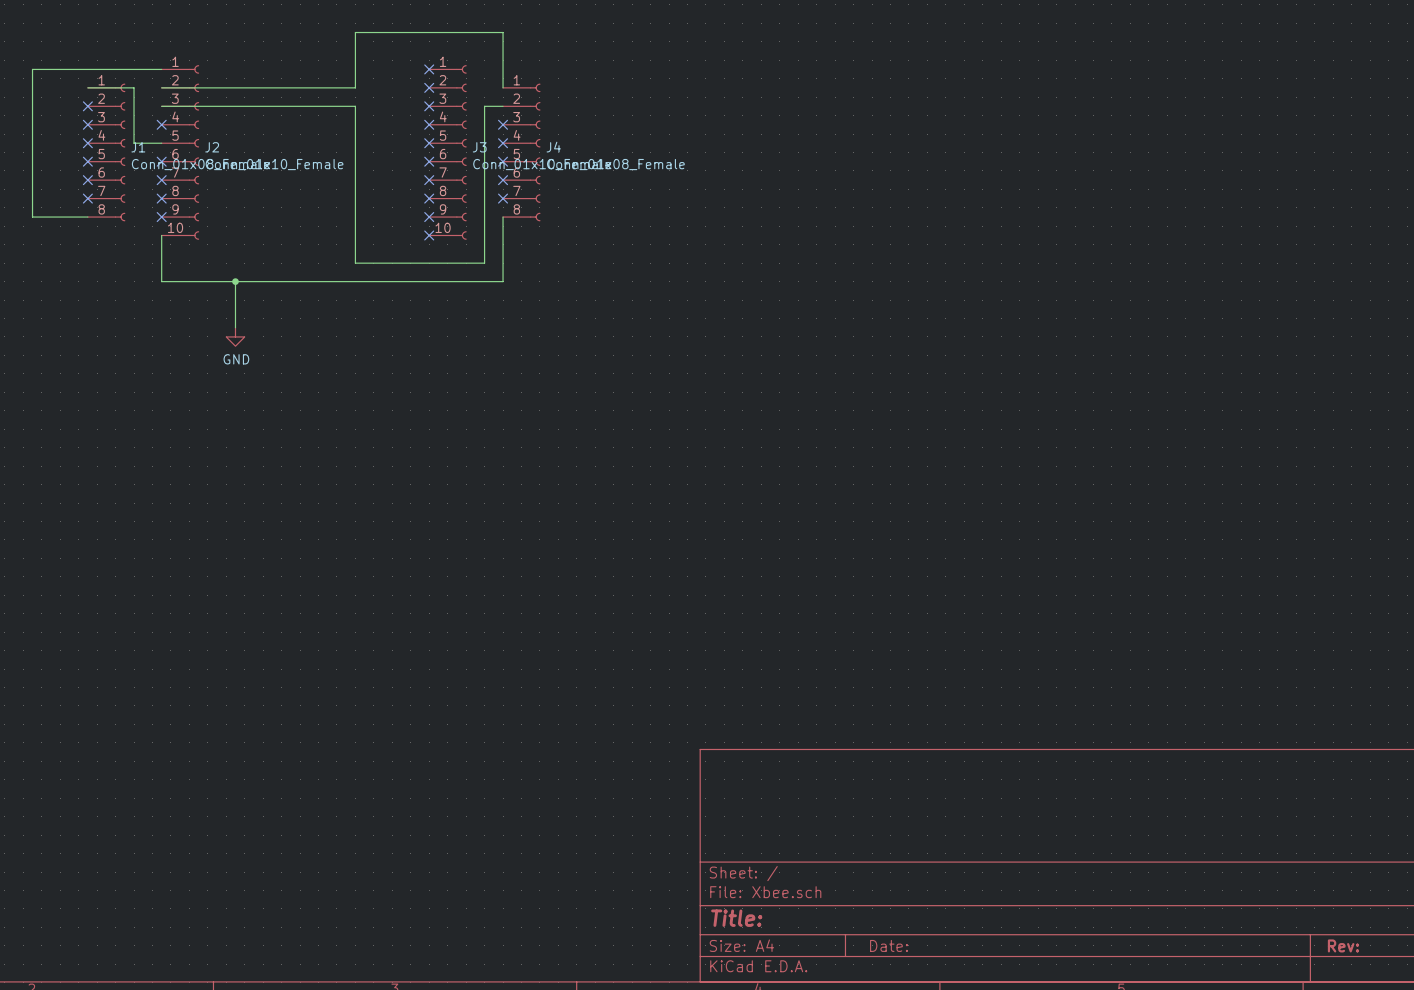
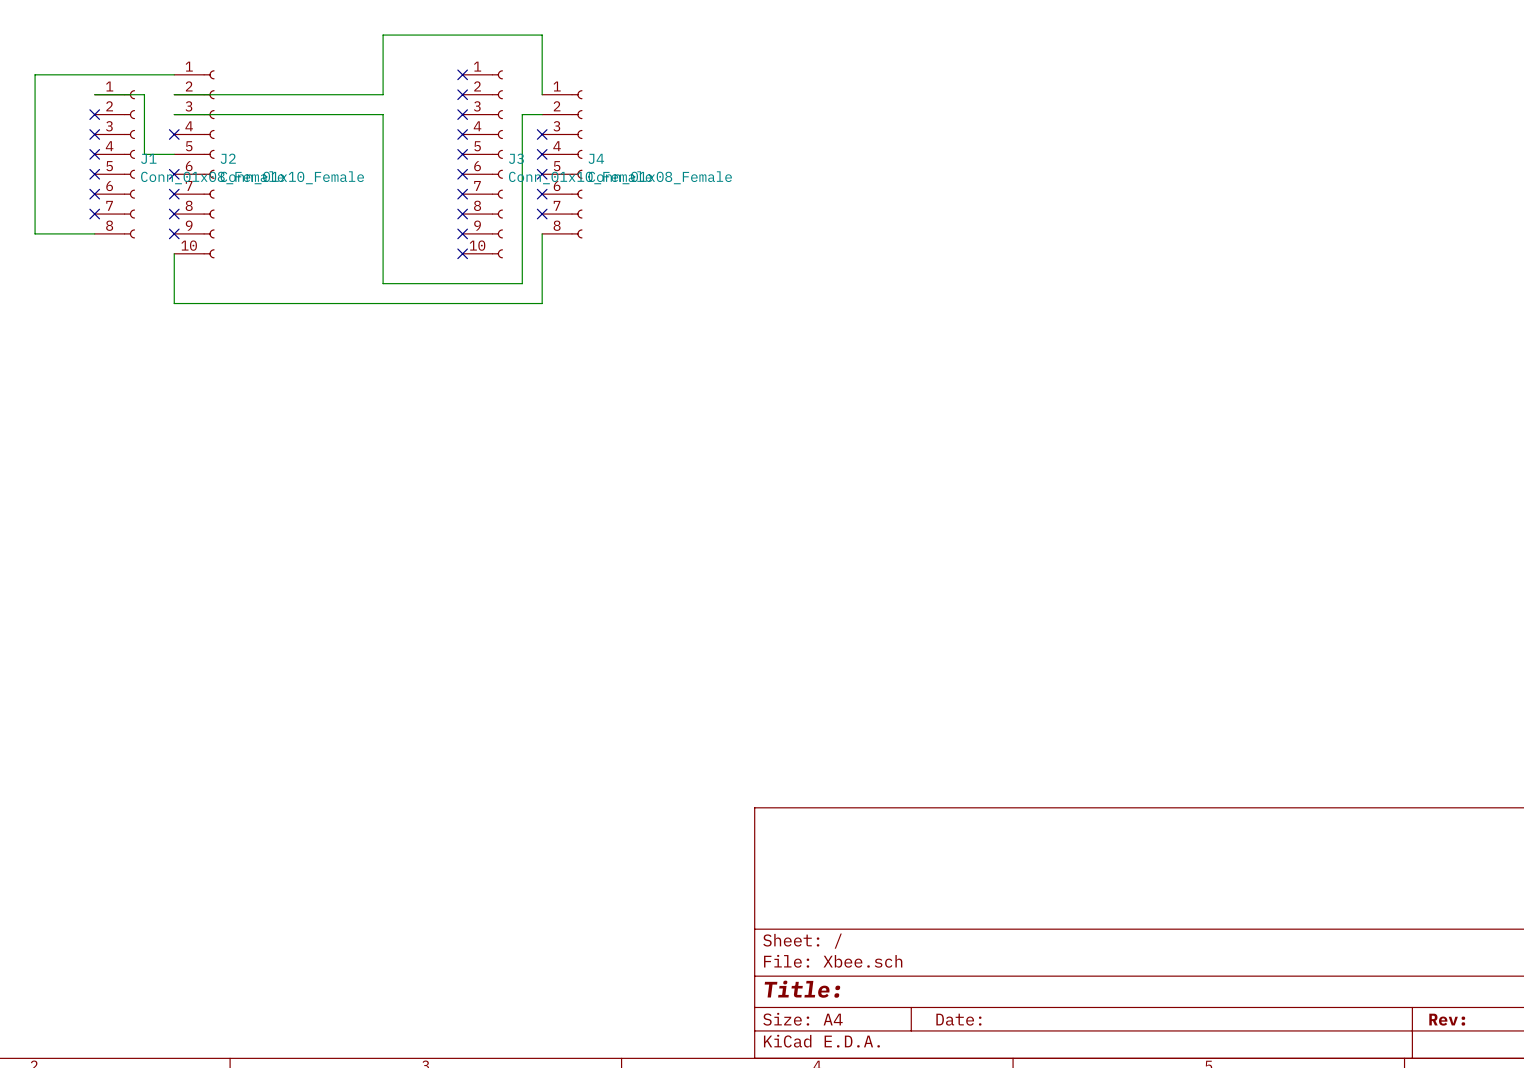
wire: (235, 281) (235, 327) -> none
junction: (235, 281) -> none
power symbol: GND (235, 336) -> none

